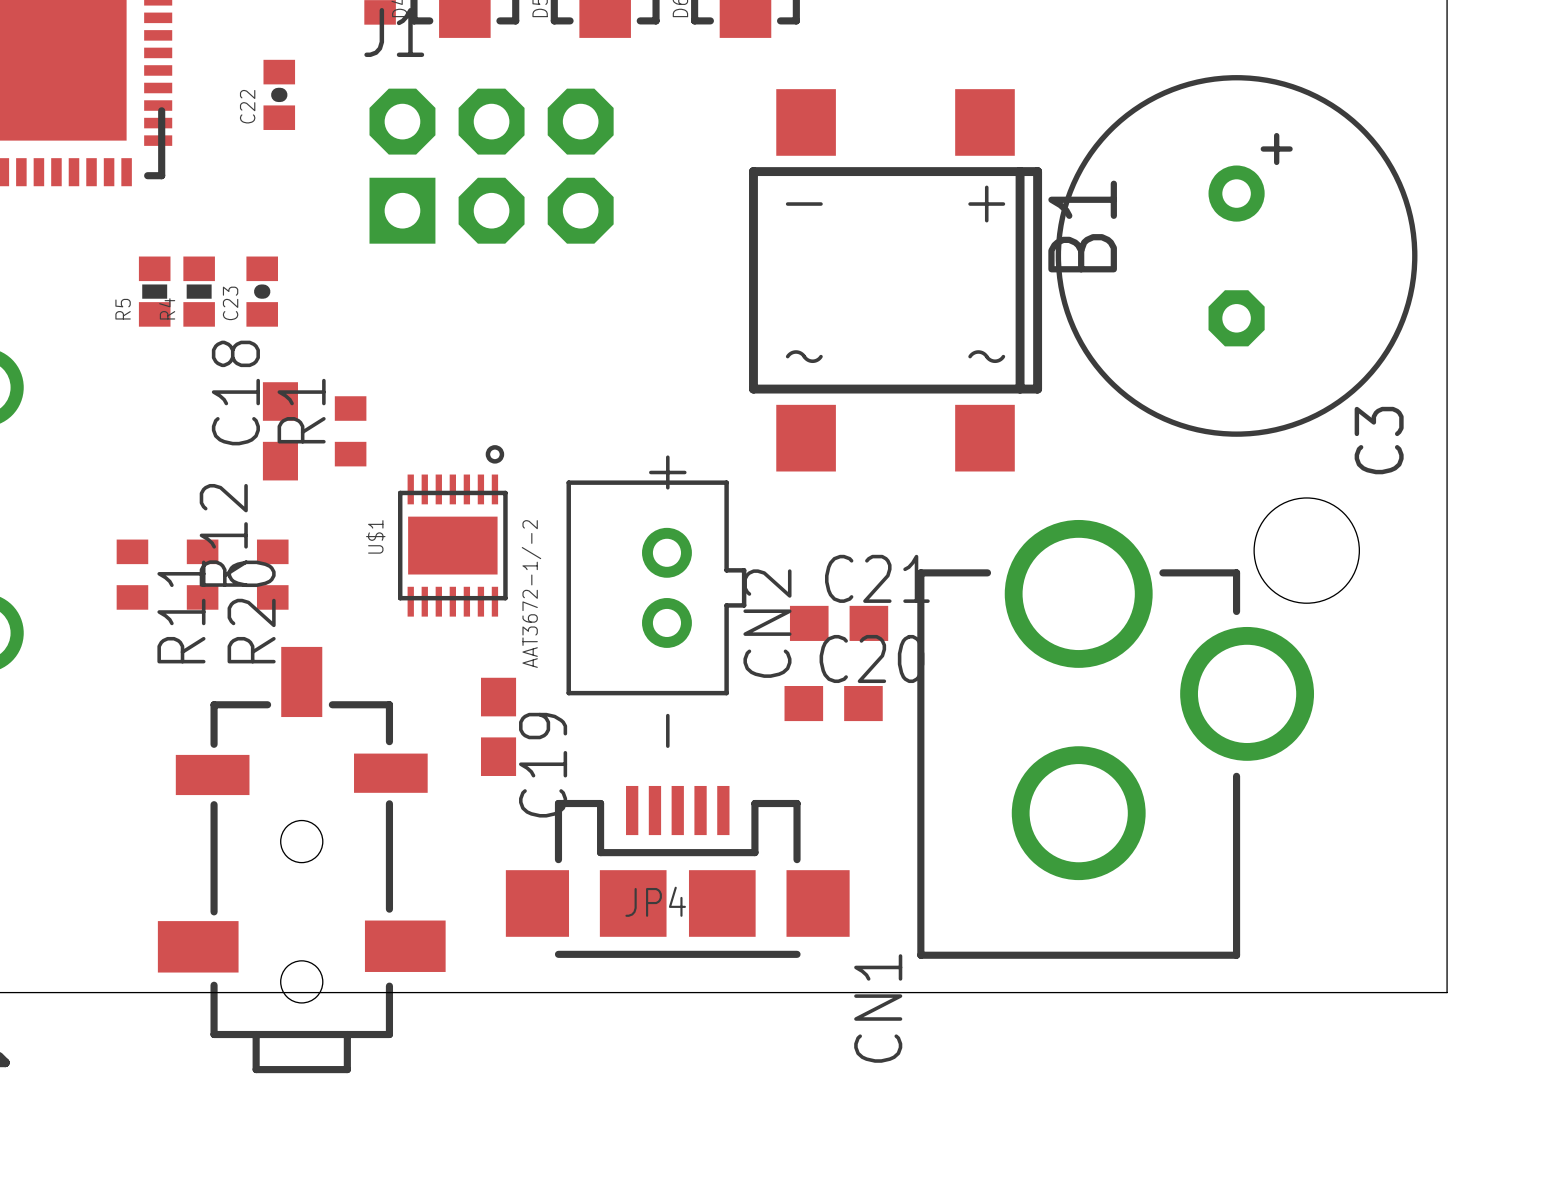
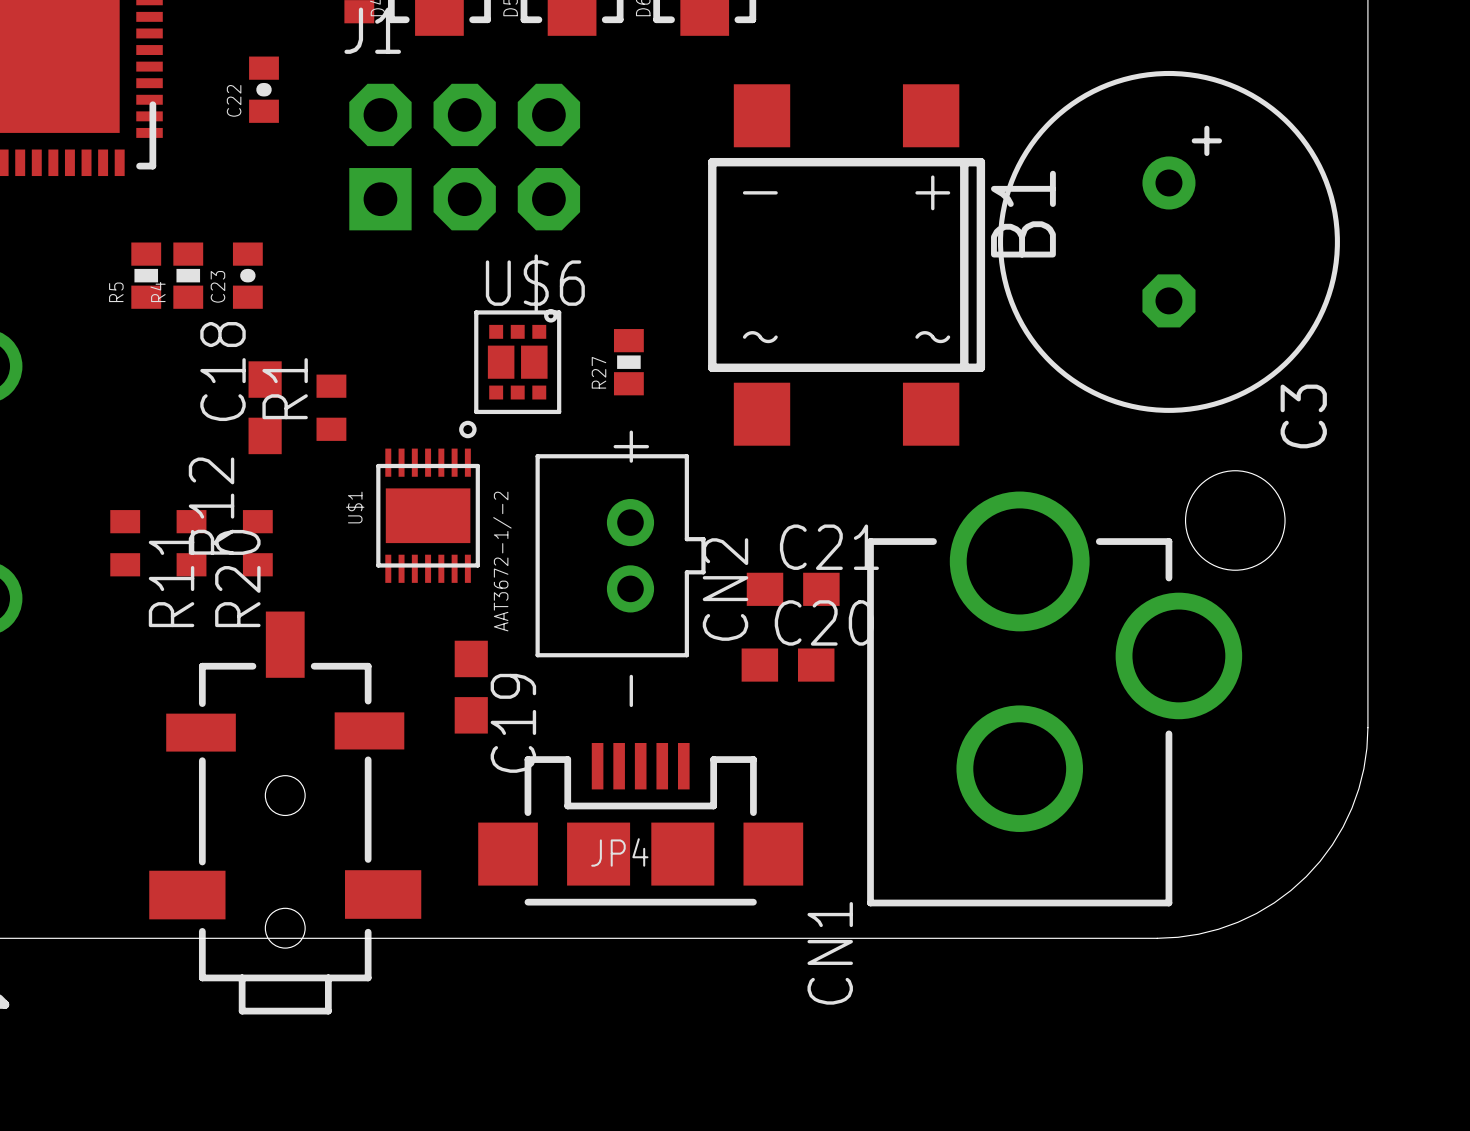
U$6: none -> (517, 361)
R27: none -> (628, 362)
board edge: (1447, 769) (1447, 992) (1224, 992) -> (1367, 727) (1363, 768) (1351, 808) (1332, 844) (1306, 876) (1274, 902) (1237, 922) (1198, 934) (1157, 938)

